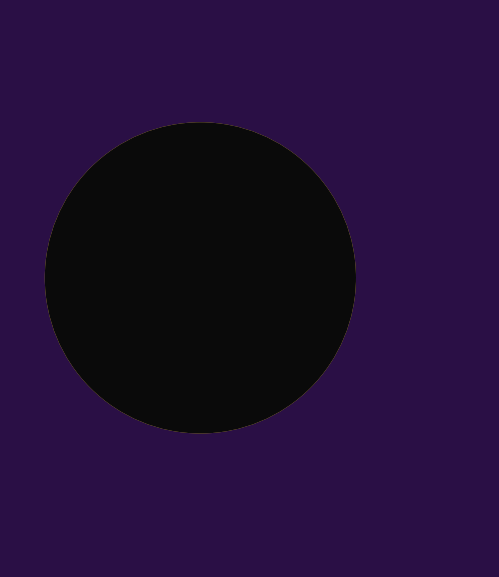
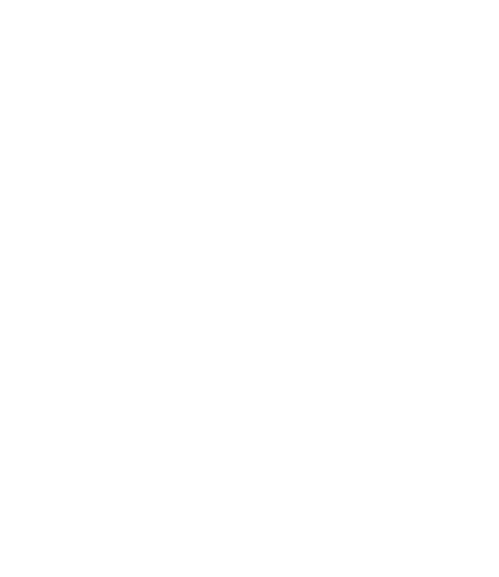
part: (200, 277) -> none

